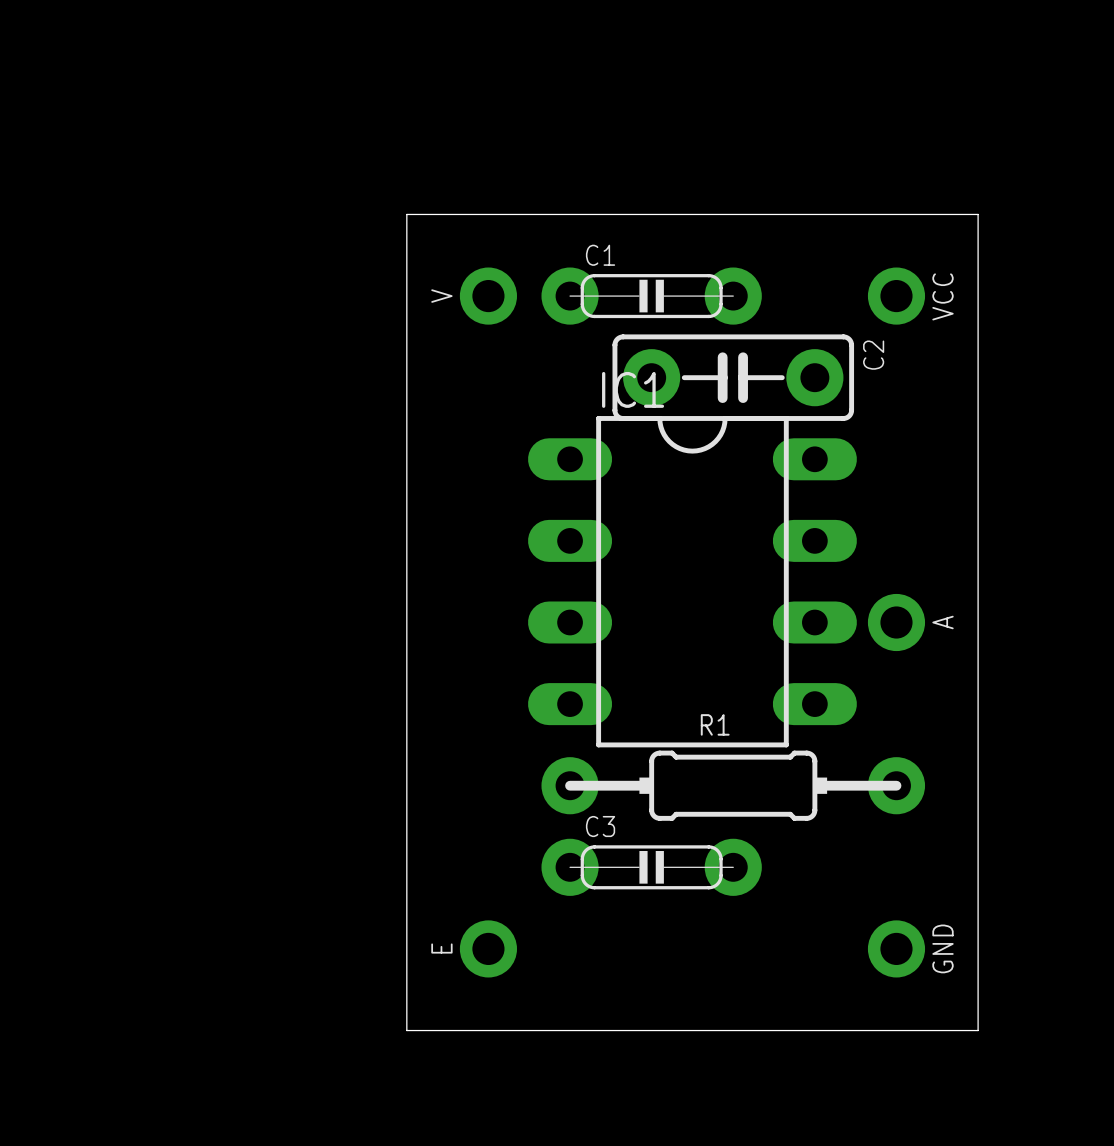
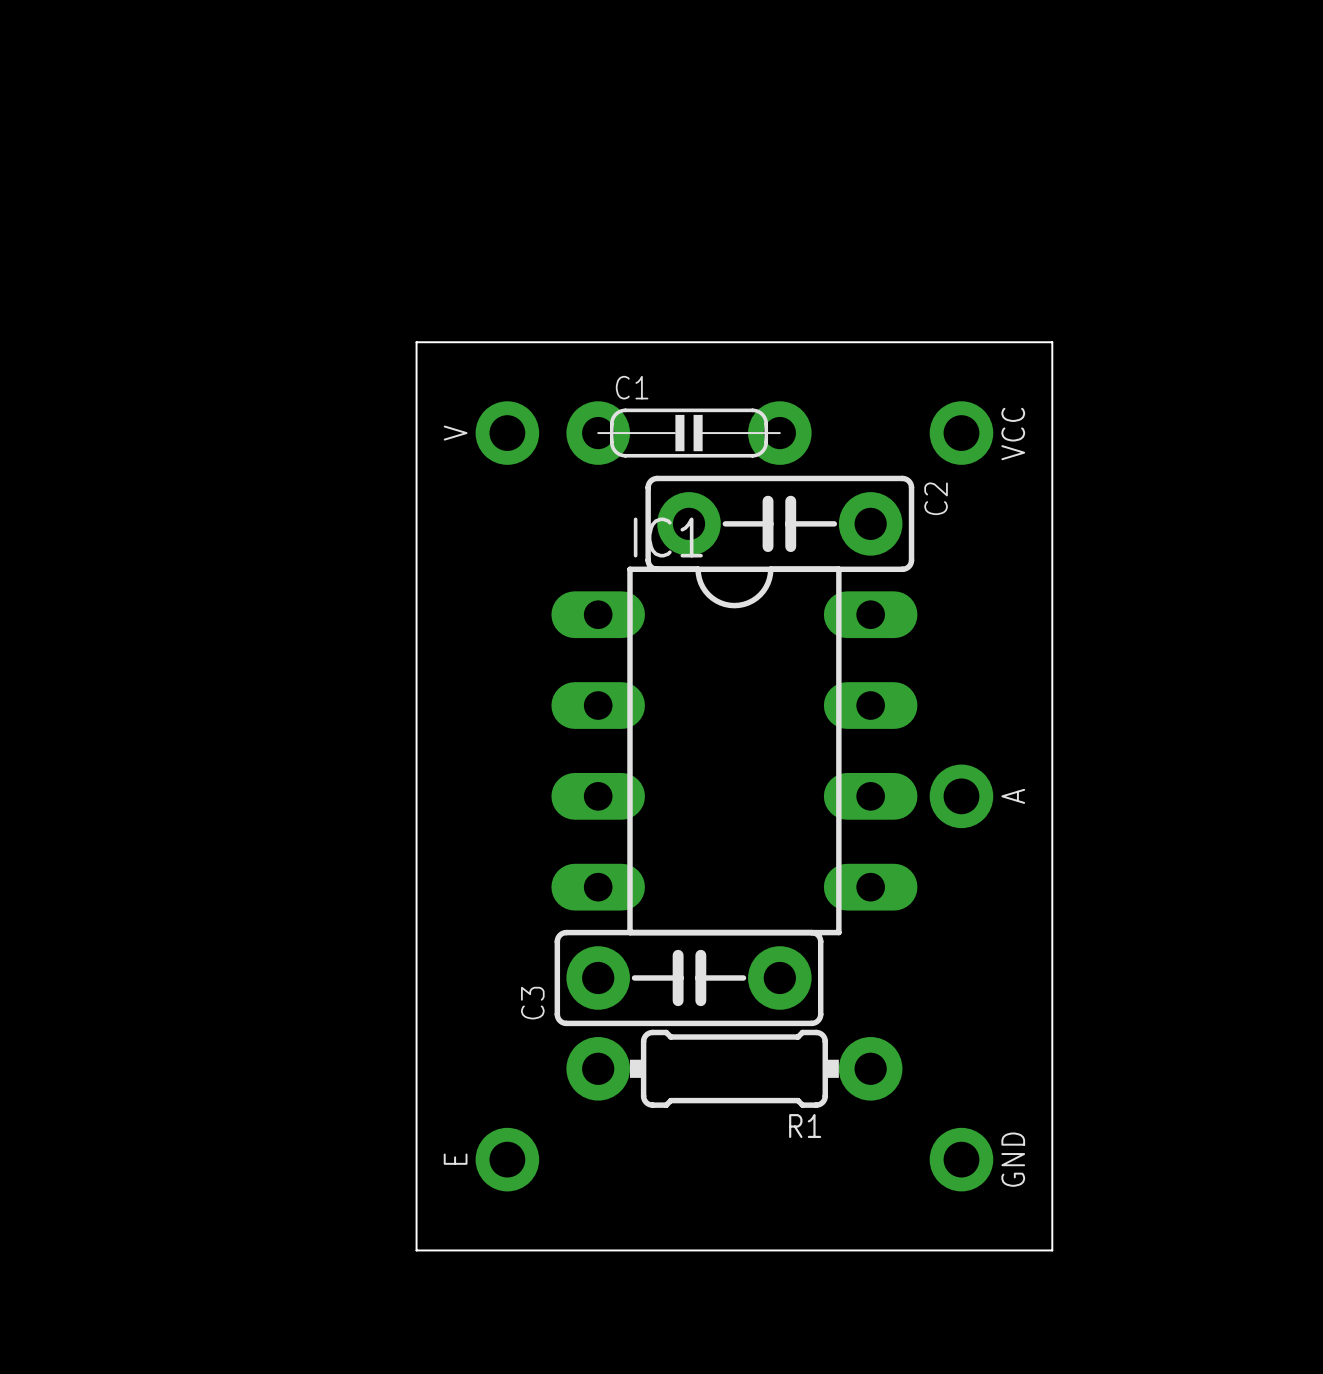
R1 name position: R1 (715, 724) -> R1 (805, 1126)
R1 footprint: [541, 750, 926, 821] -> [566, 1029, 903, 1108]
C3 name position: C3 (600, 826) -> C3 (532, 1003)
C3 footprint: [541, 838, 762, 896] -> [554, 929, 824, 1027]

